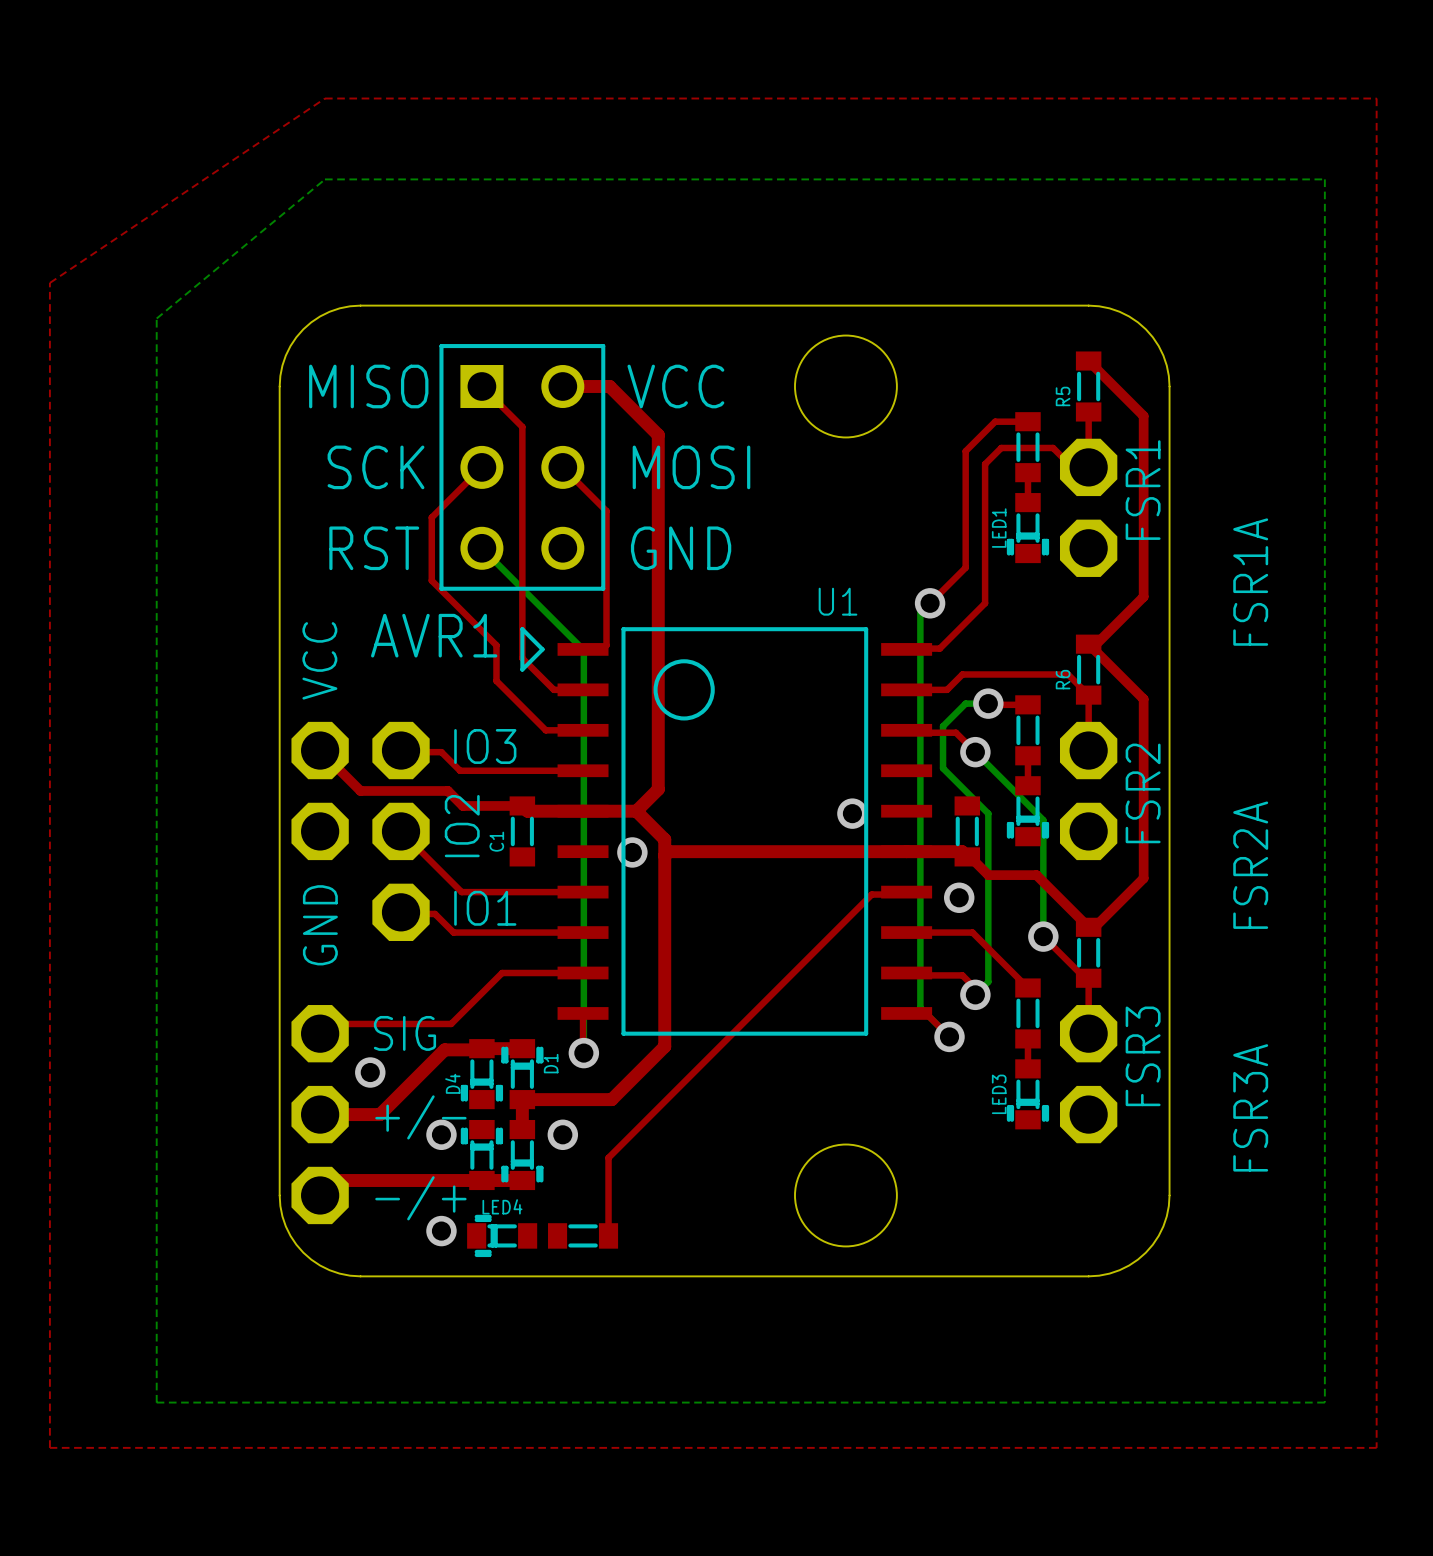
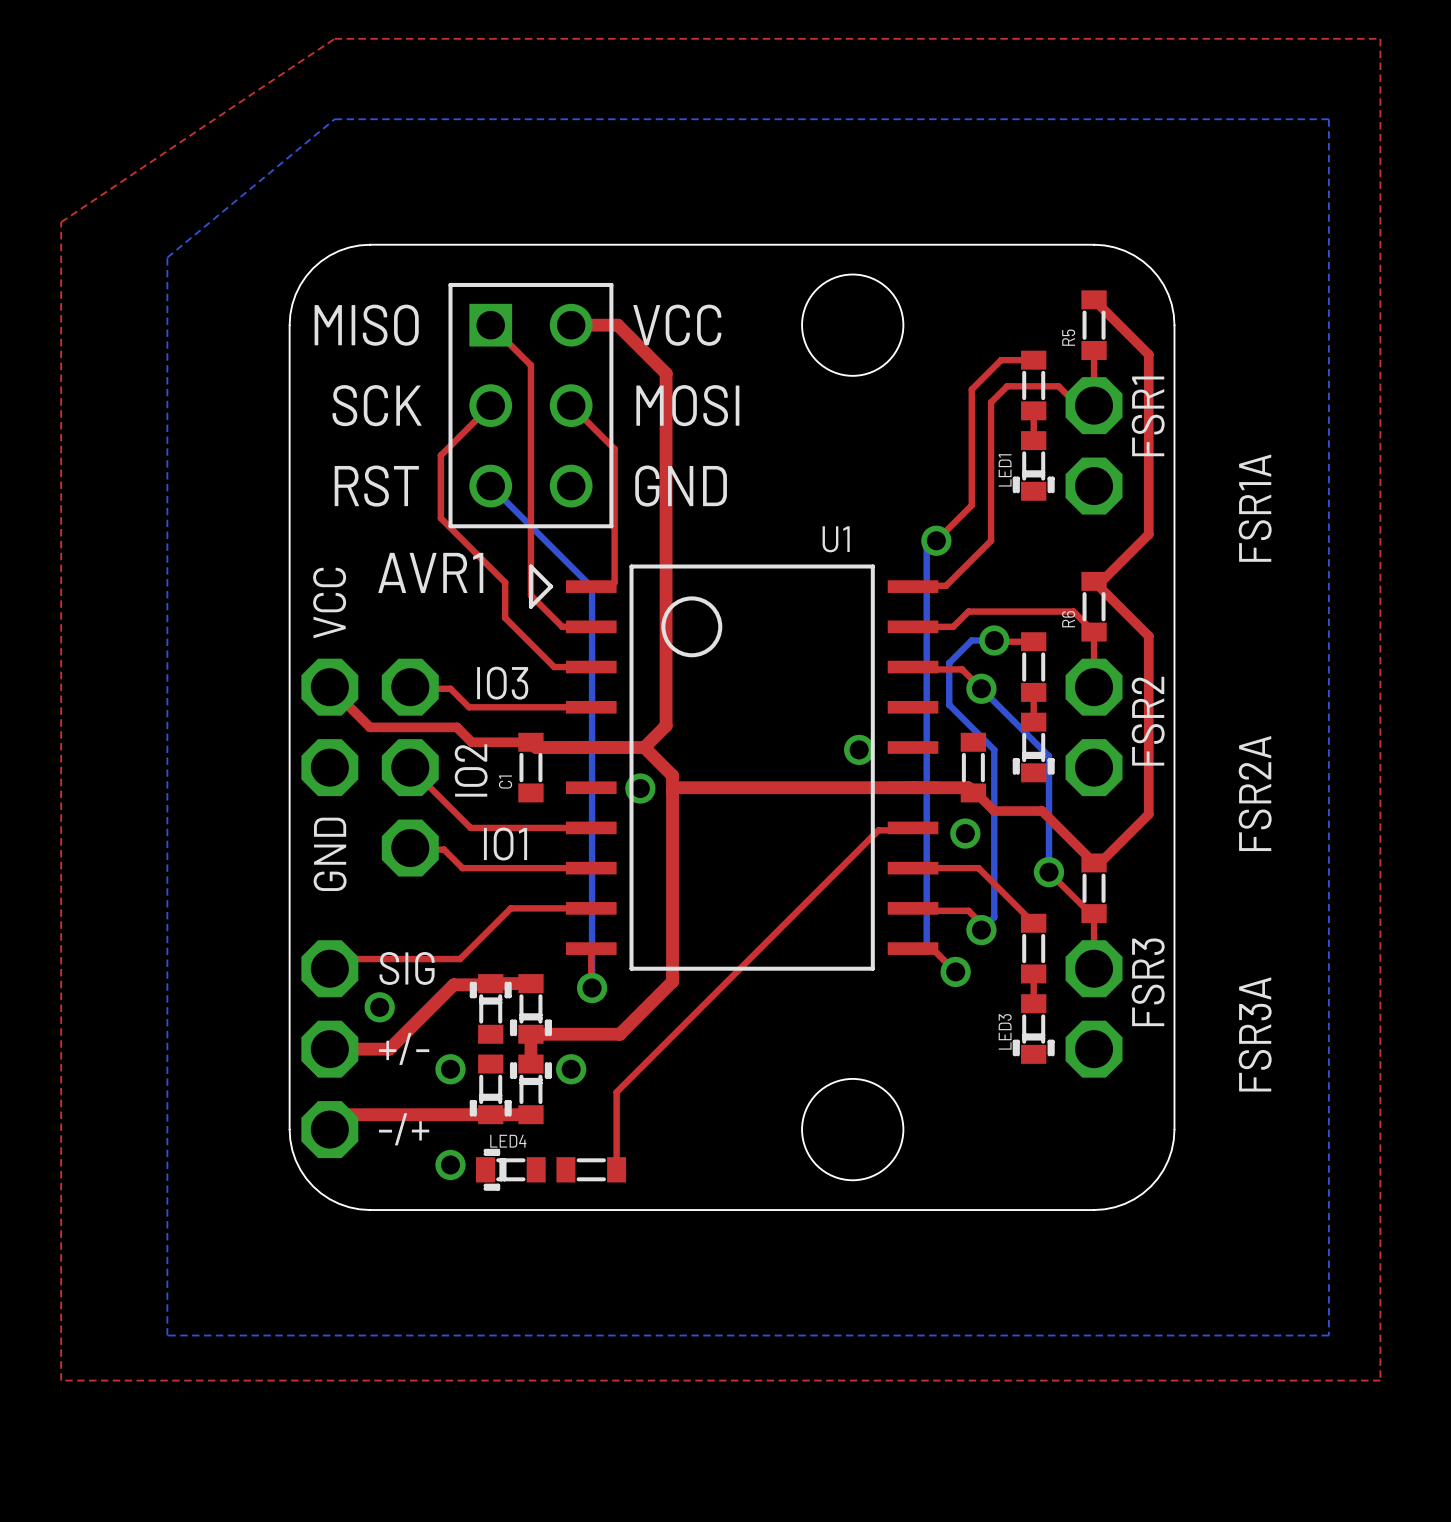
D4: (481, 1074) -> none
part: none -> (490, 1008)
D1: (522, 1074) -> none
part: none -> (530, 1008)
part rotation: 0° (481, 1155) -> 180° (490, 1089)
part rotation: 0° (522, 1155) -> 180° (530, 1089)

